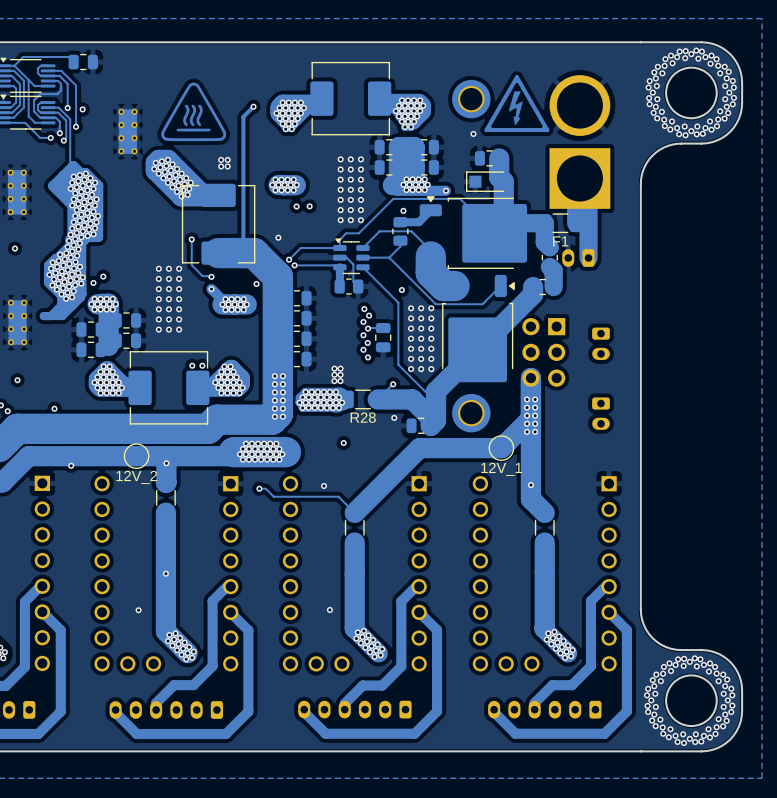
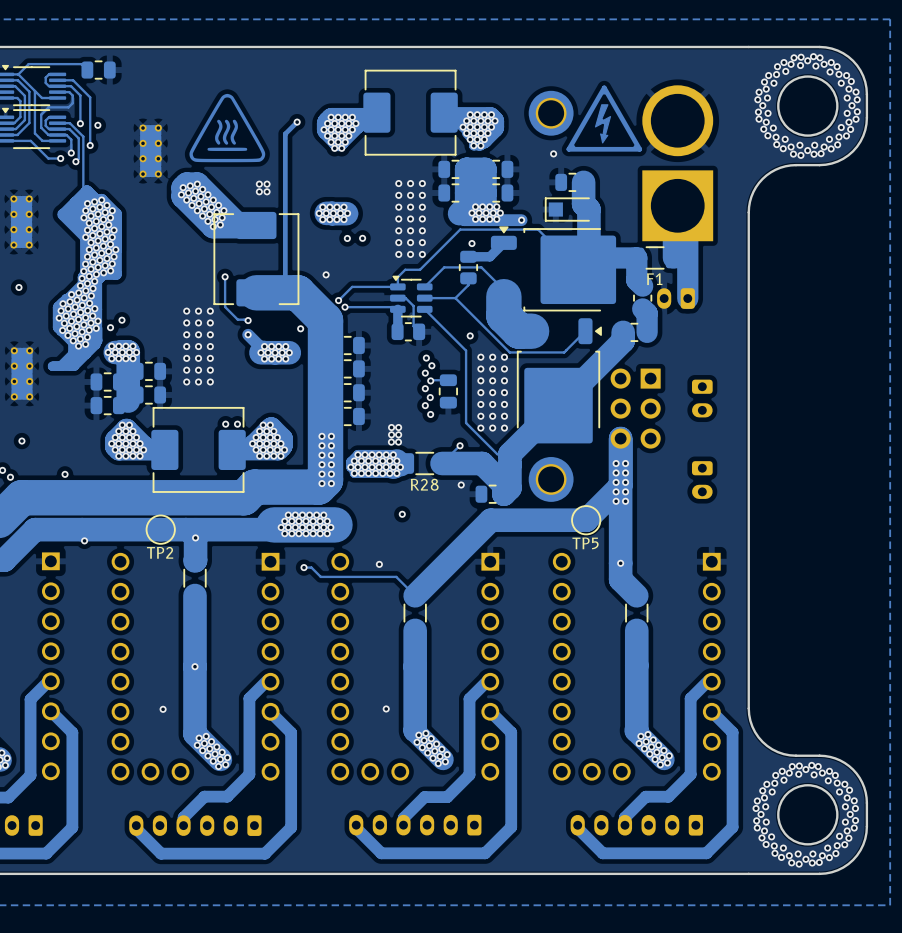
12V_1 name: 12V_1 (501, 469) -> TP5 (585, 543)
12V_2 name: 12V_2 (136, 477) -> TP2 (160, 552)

